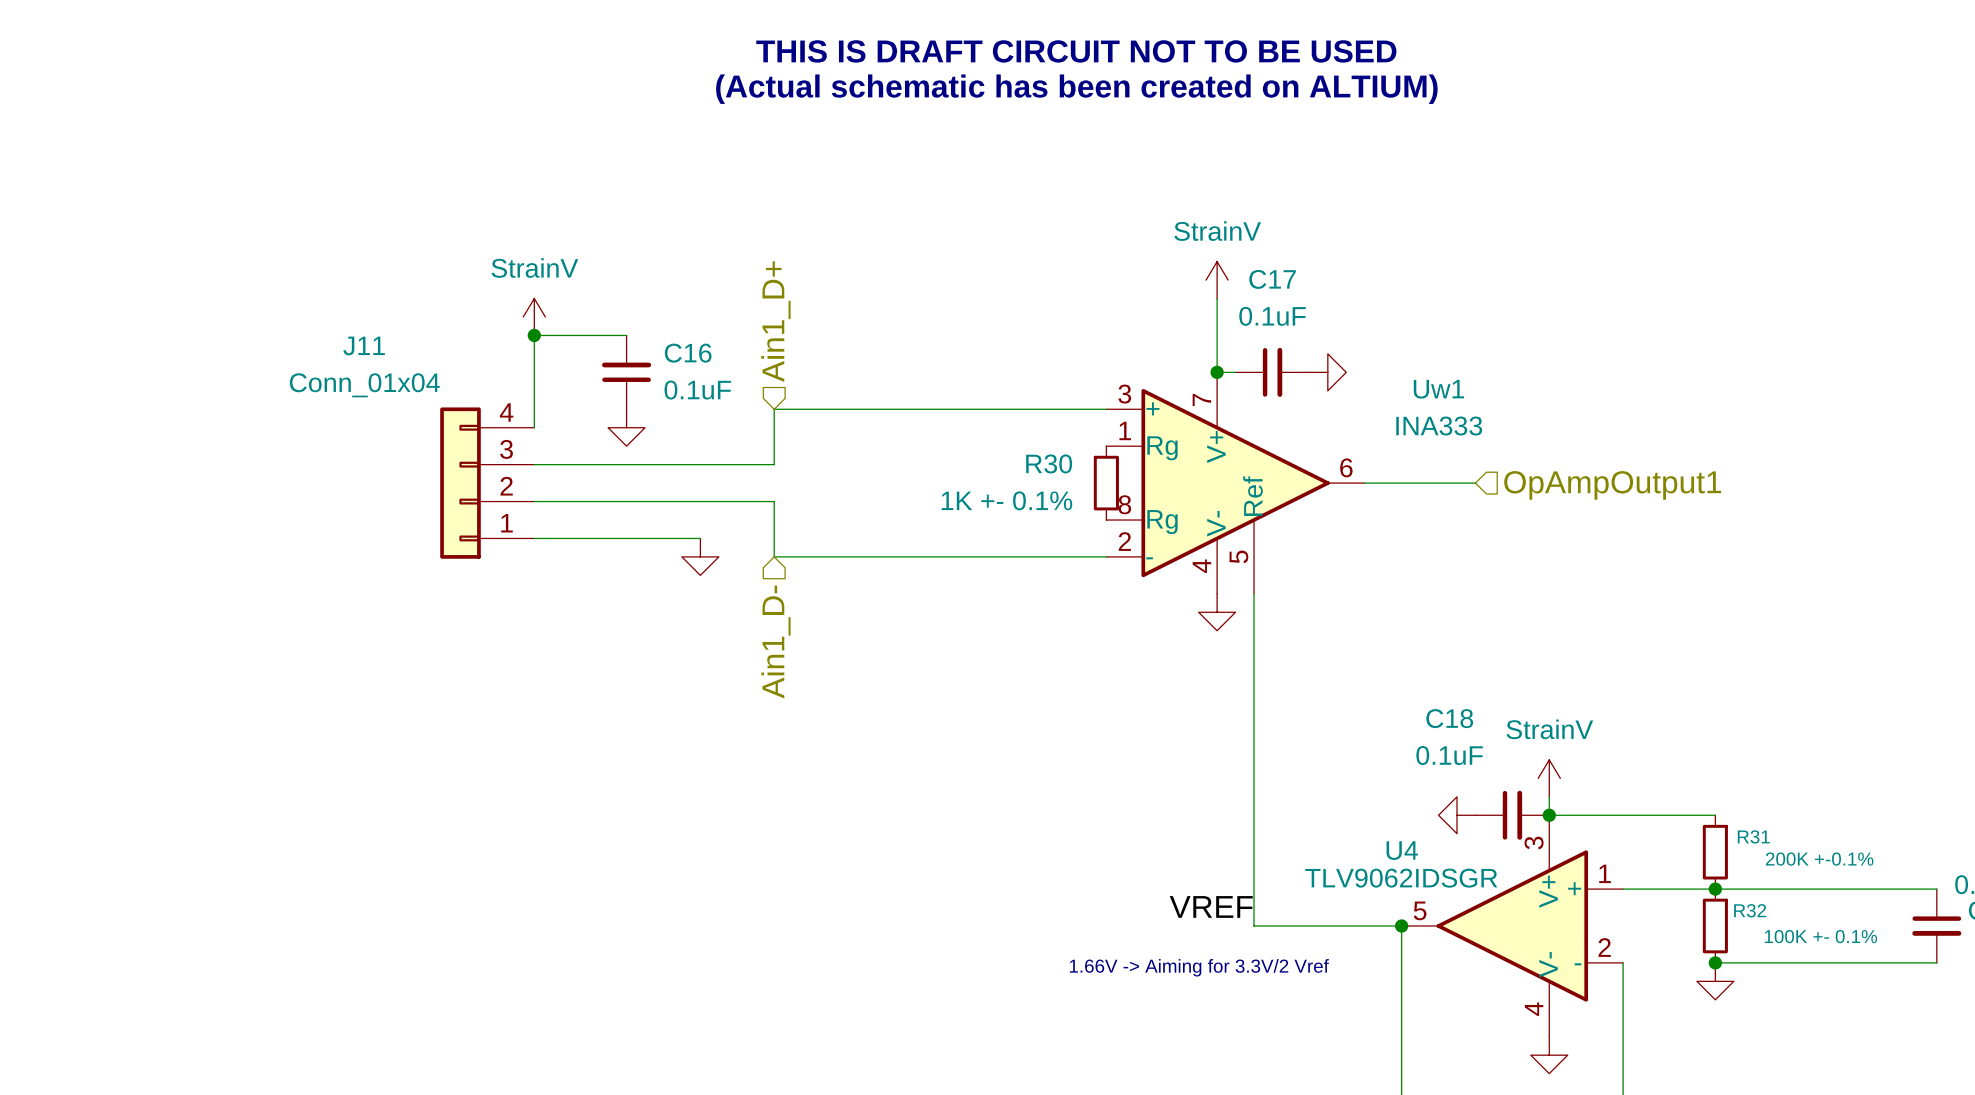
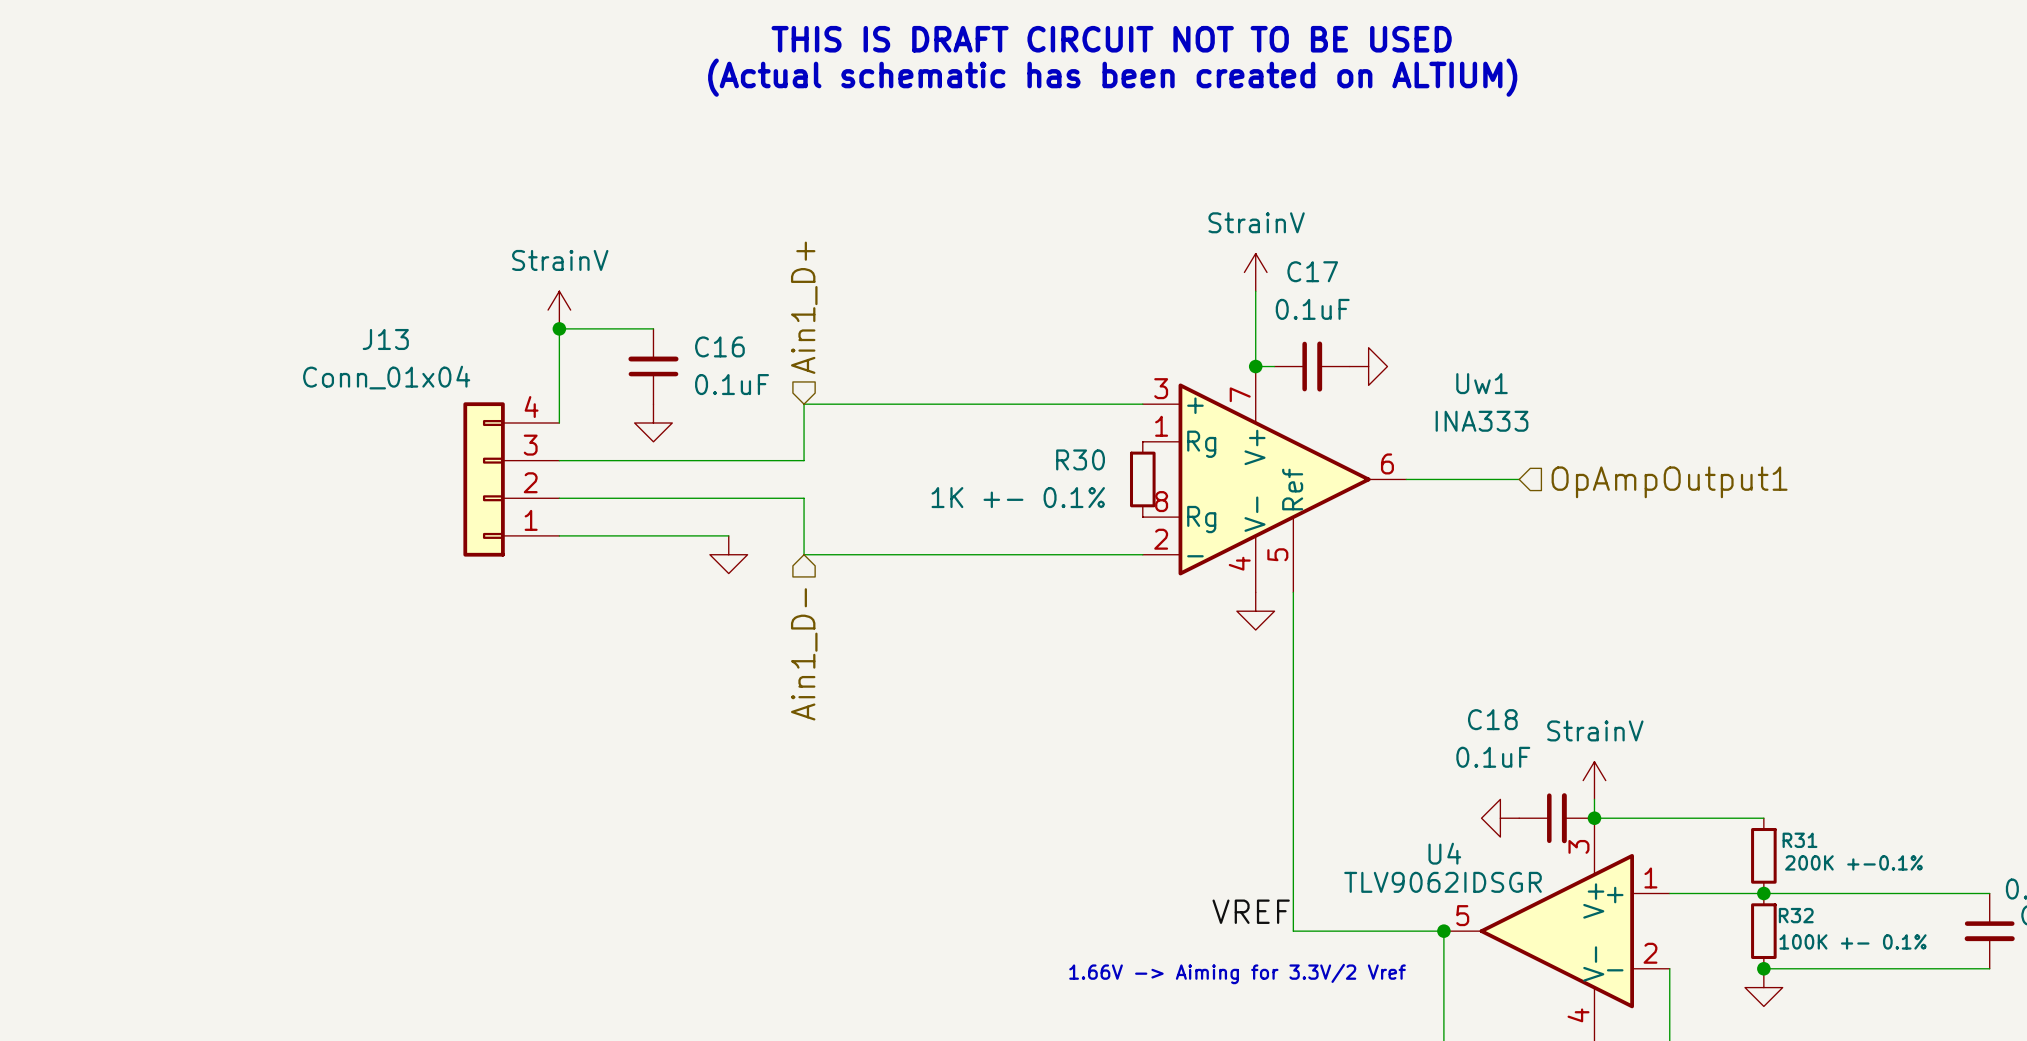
J11 name: J11 (364, 345) -> J13 (385, 339)

